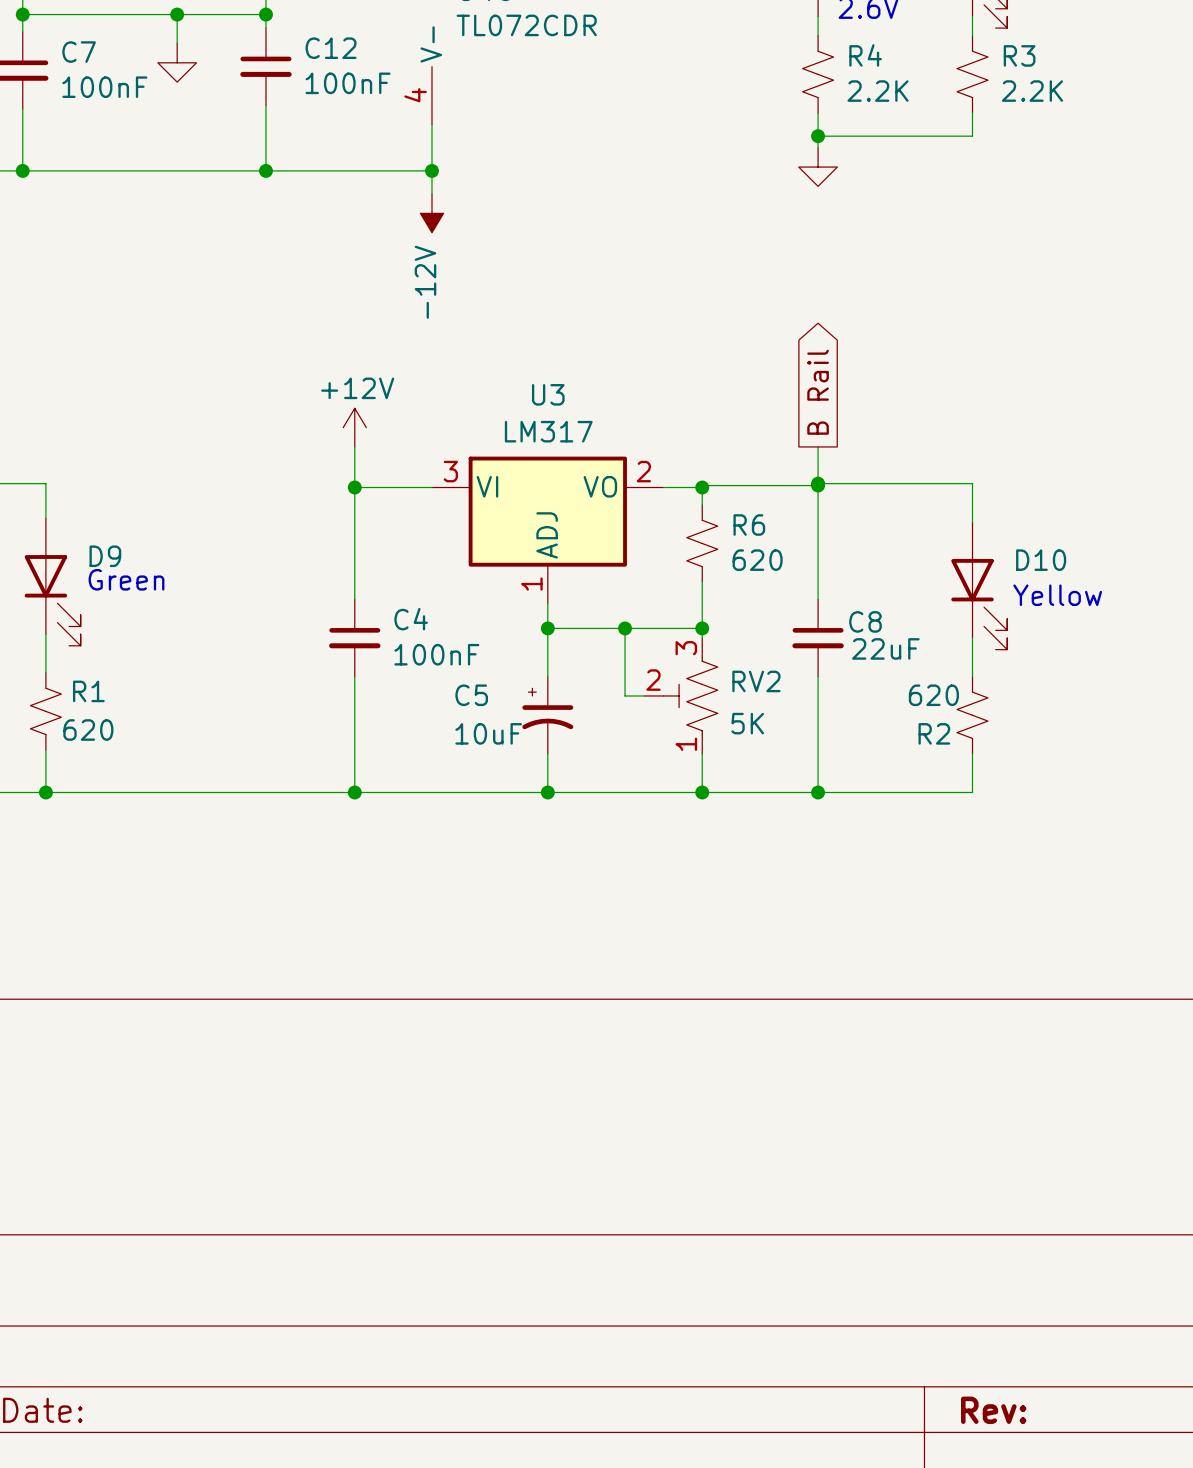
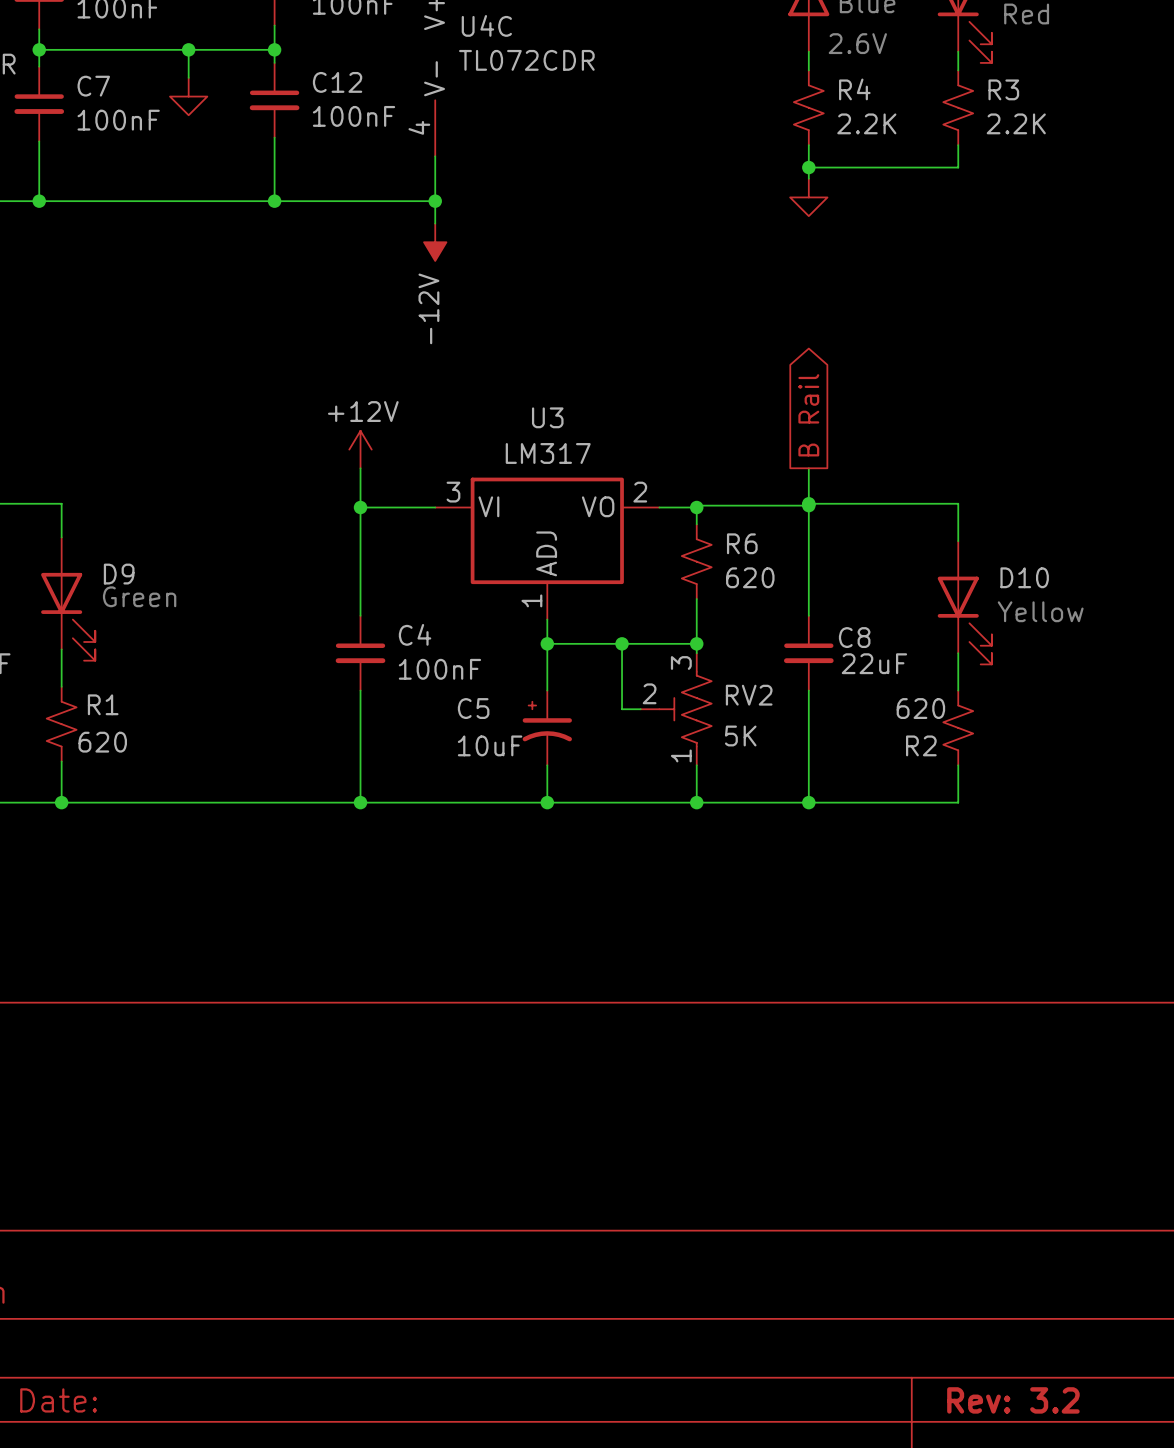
title block: Rev: (993, 1410) -> Rev: 3.2 (1013, 1400)

